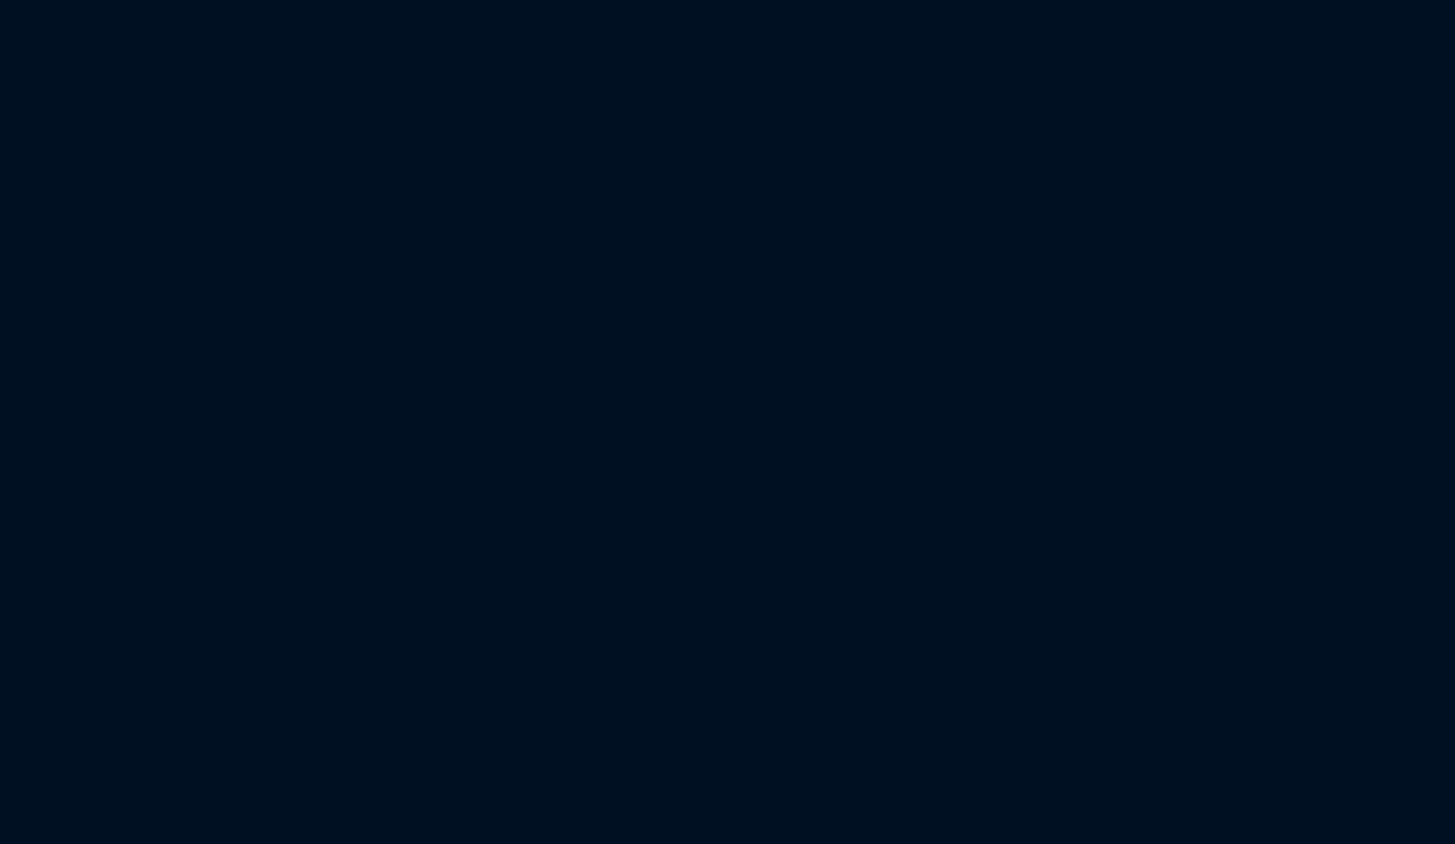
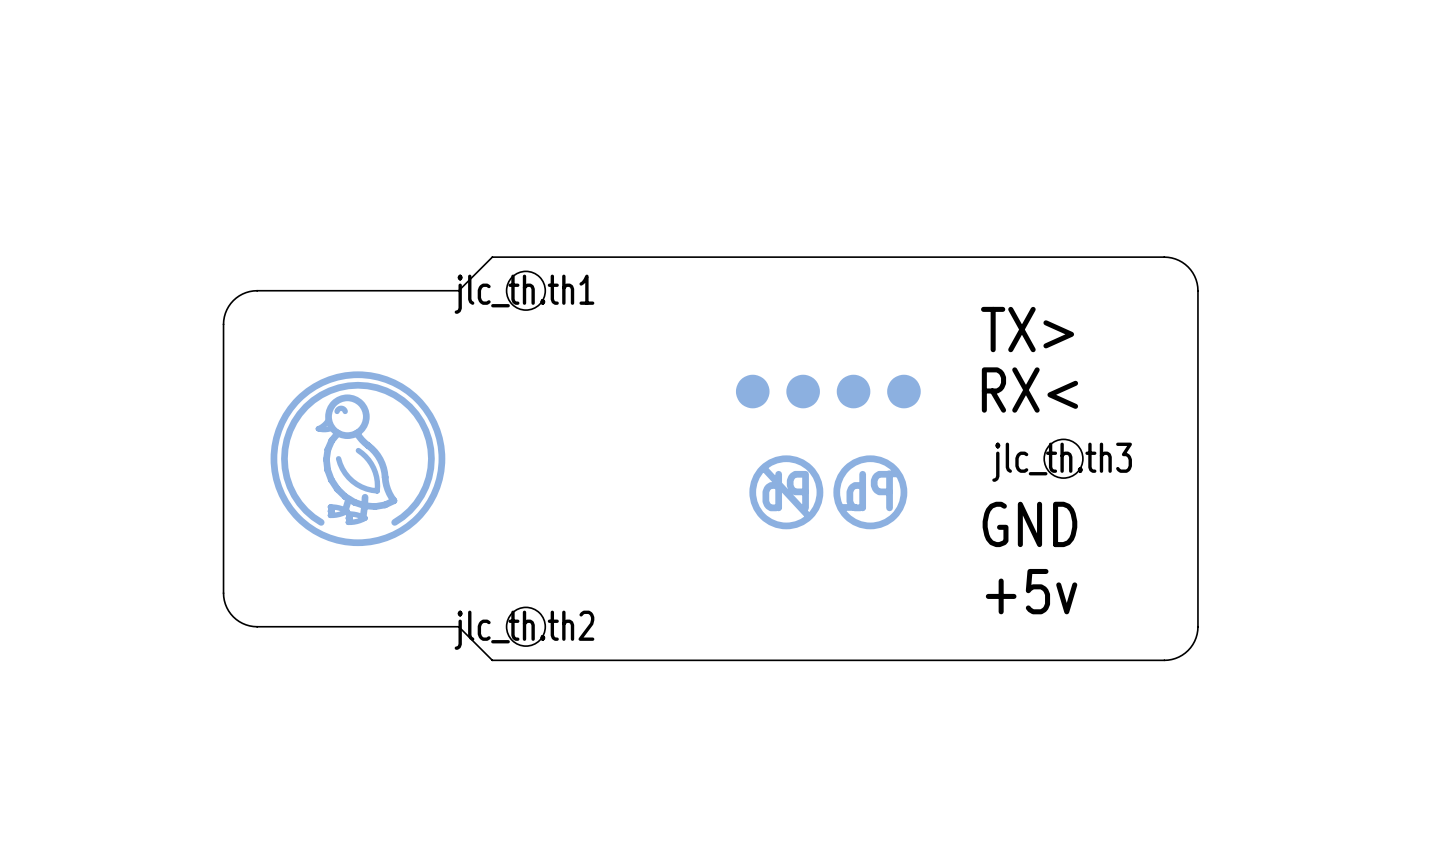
board edge: none -> (492, 257) (458, 290) (253, 290) (239, 295) (228, 306) (223, 324) (223, 593) (228, 611) (239, 621) (257, 626) (458, 626) (492, 660) (1164, 660) (1182, 655) (1194, 641) (1197, 626) (1197, 290) (1192, 272) (1178, 260) (1164, 257) (492, 257)
jlc_th.th1: none -> (525, 290)
text: none -> TX> (1027, 329)
drawing: none -> [270, 371, 446, 547]
drawing: none -> [735, 374, 921, 409]
text: none -> RX< (1029, 390)
drawing: none -> [749, 455, 908, 530]
jlc_th.th3: none -> (1063, 458)
text: none -> GND (1029, 524)
text: none -> +5v (1031, 591)
jlc_th.th2: none -> (525, 626)

